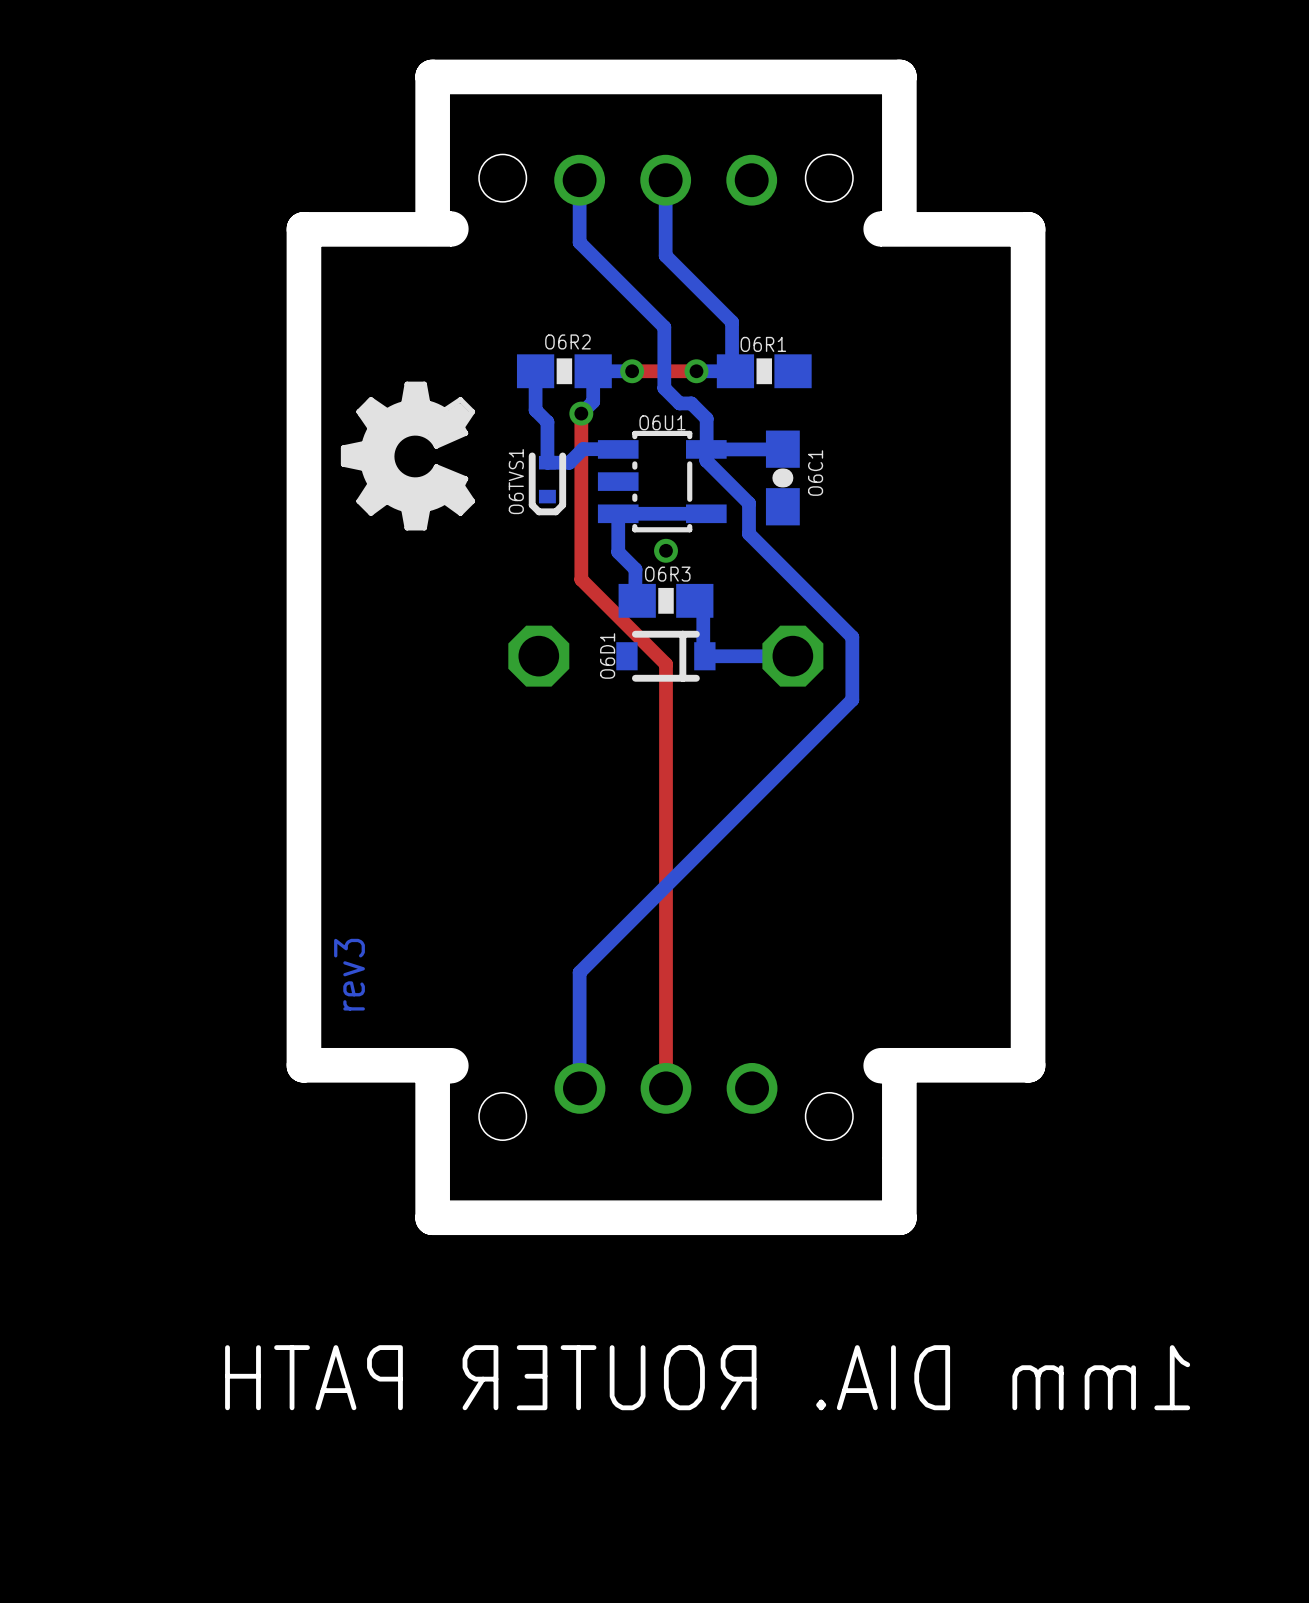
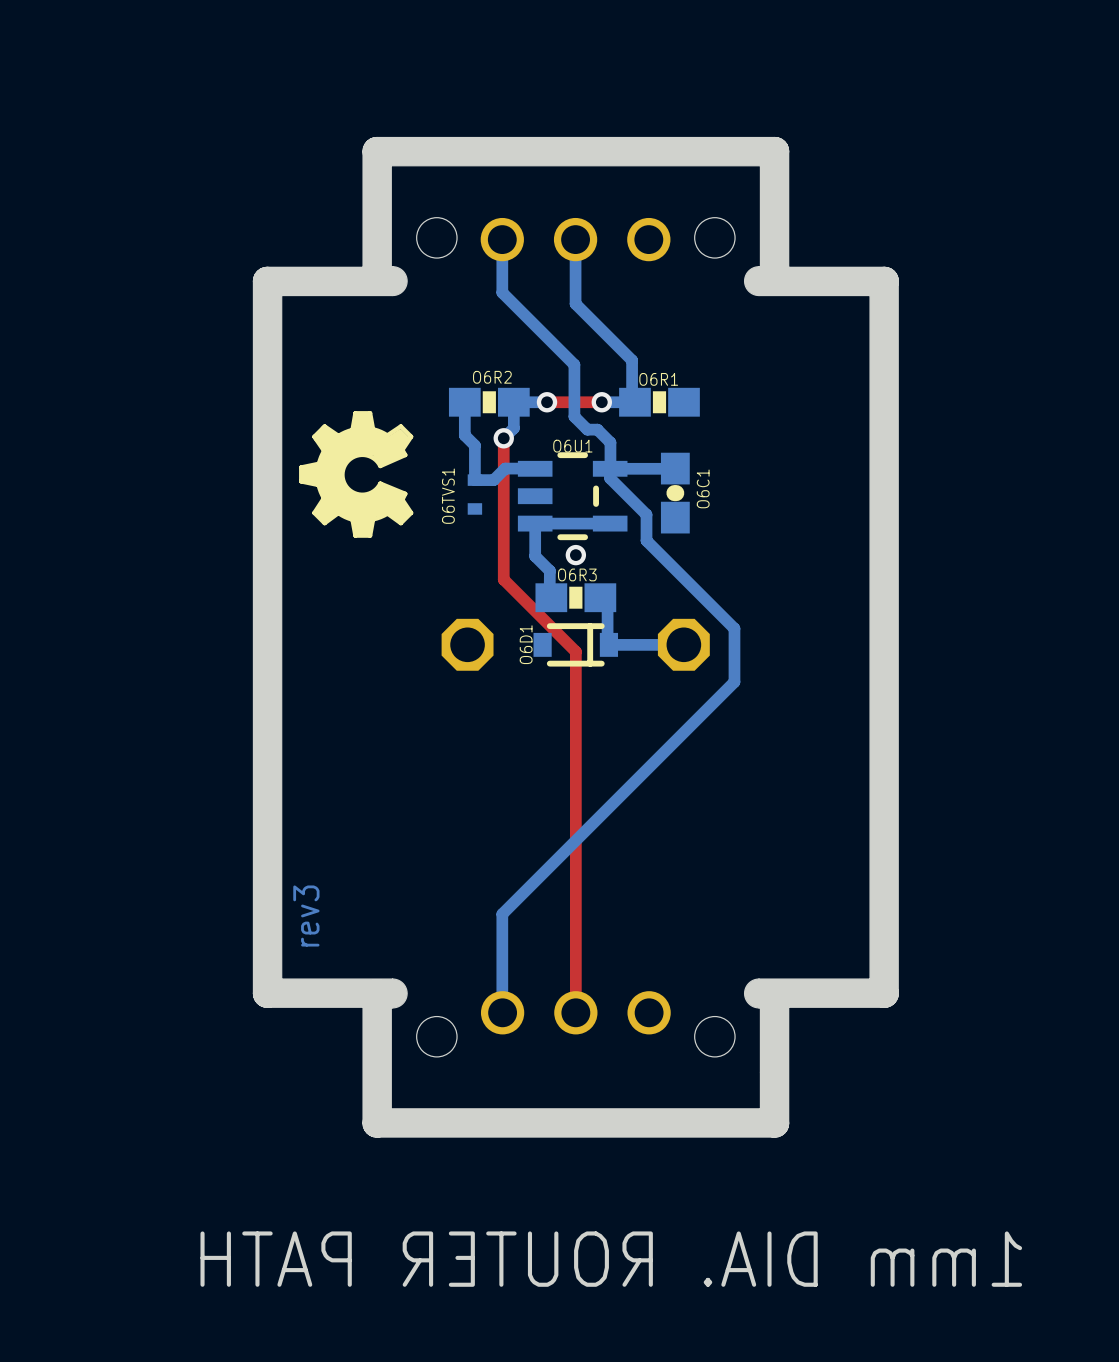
O6U1 footprint: [597, 430, 727, 533] -> [517, 452, 628, 541]
O6TVS1 footprint: [528, 452, 567, 516] -> [467, 474, 483, 515]

